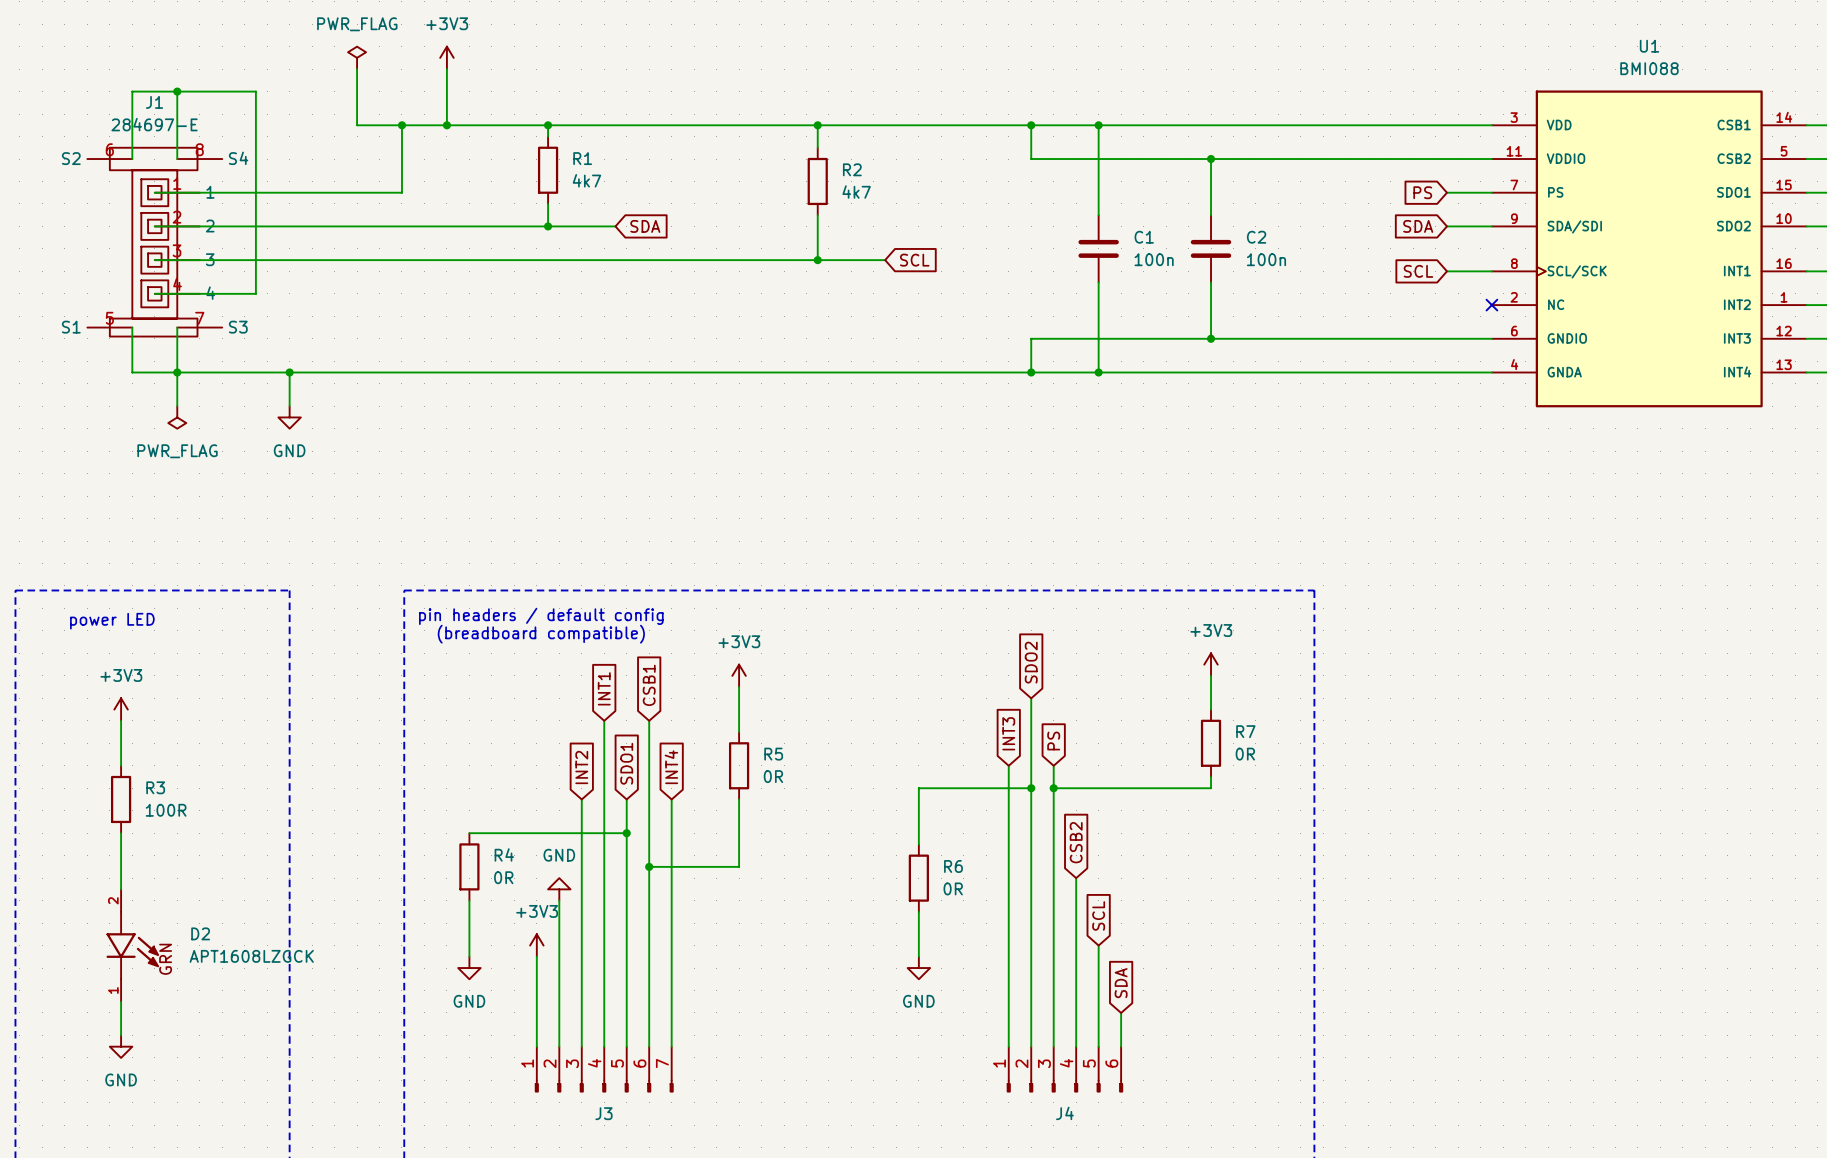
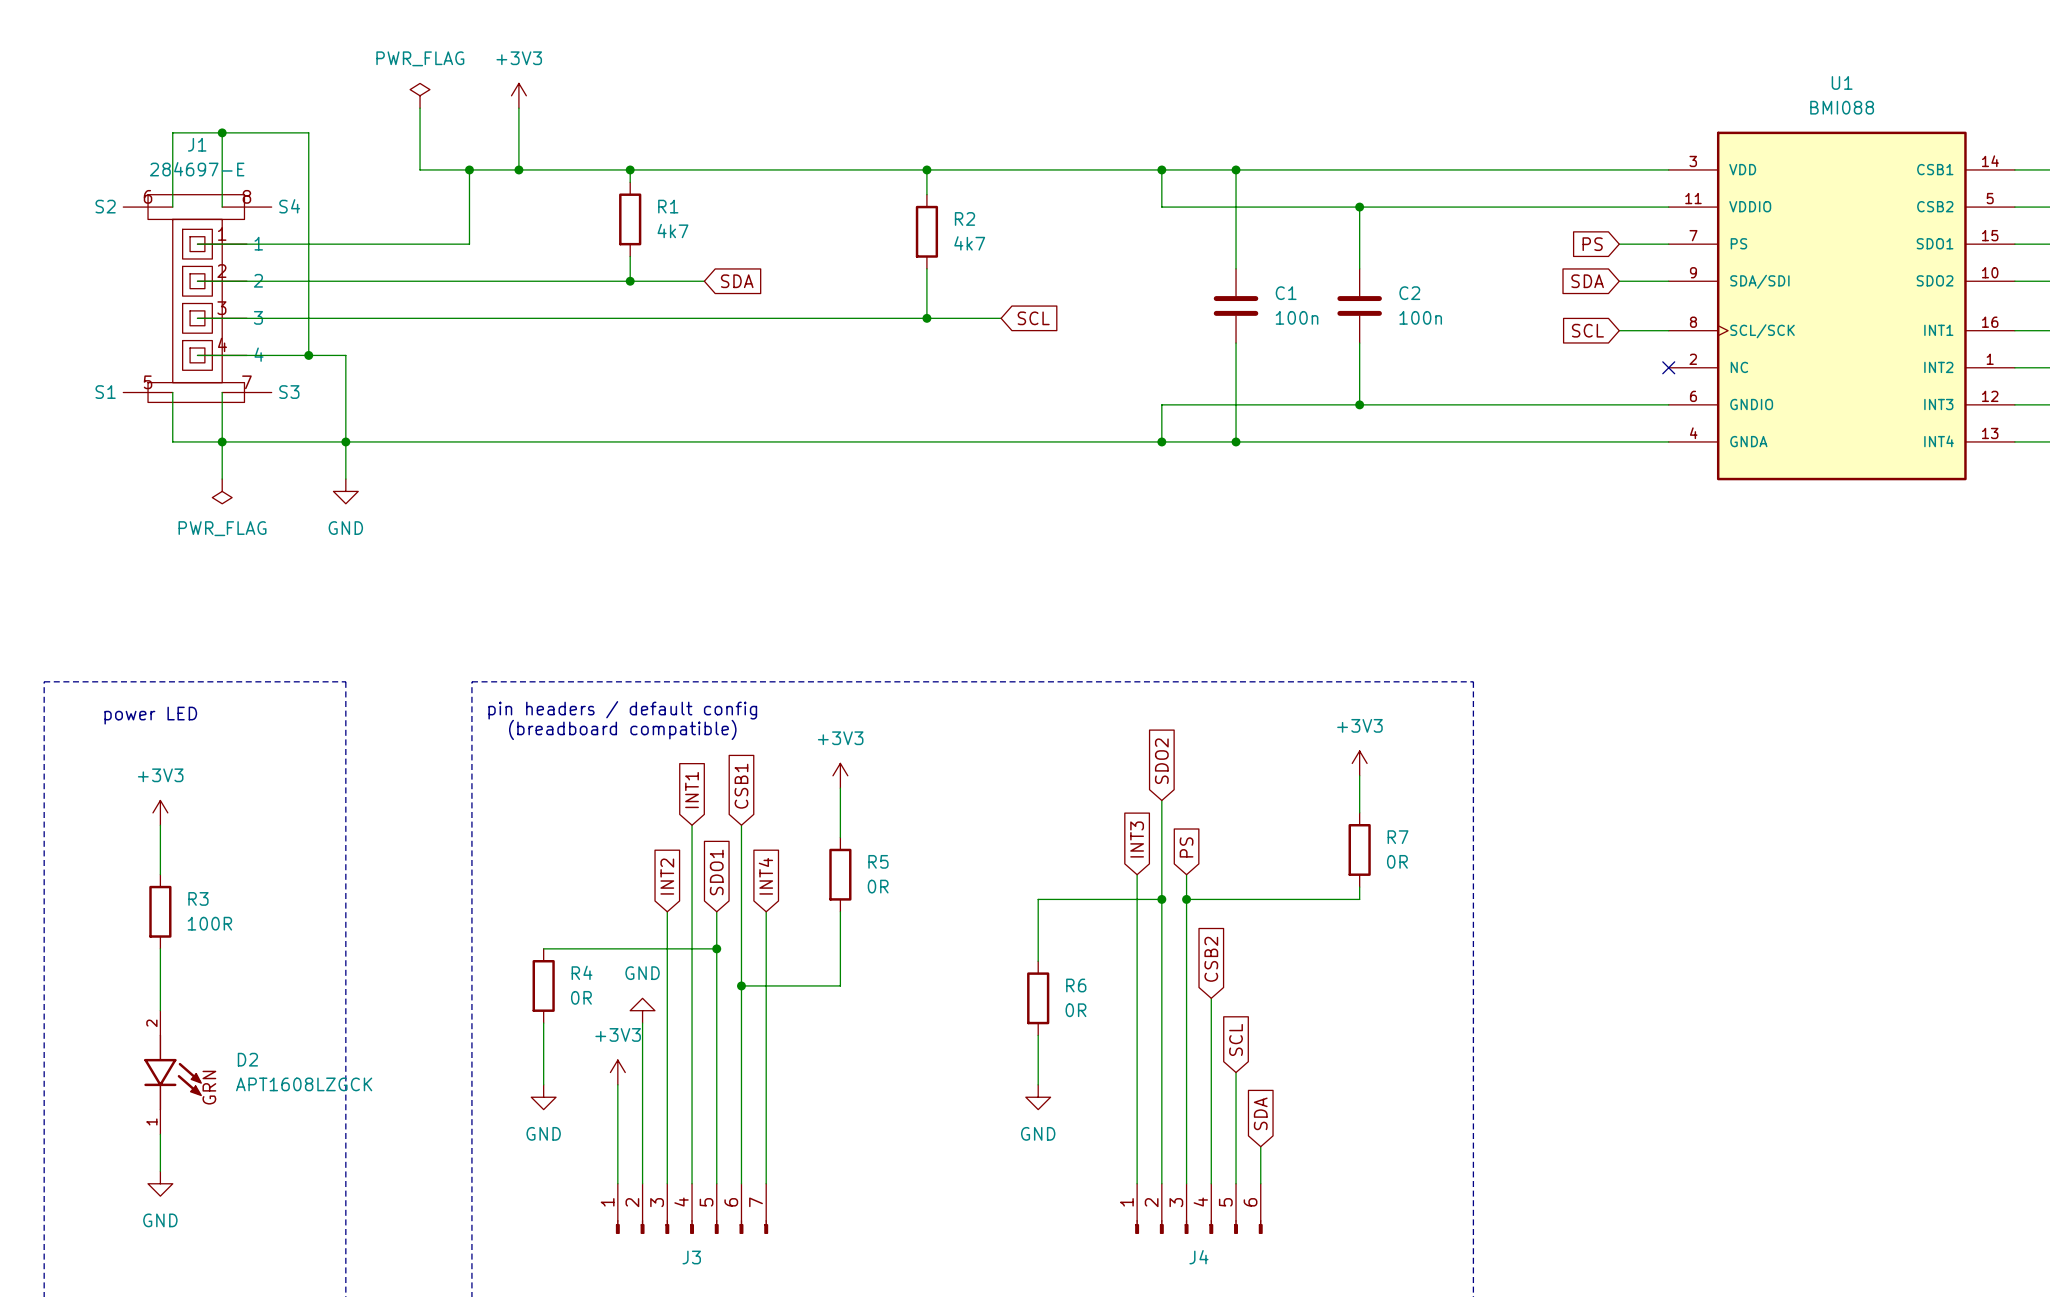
wire: none -> (308, 355) (345, 355) (345, 441)
junction: none -> (308, 355)

